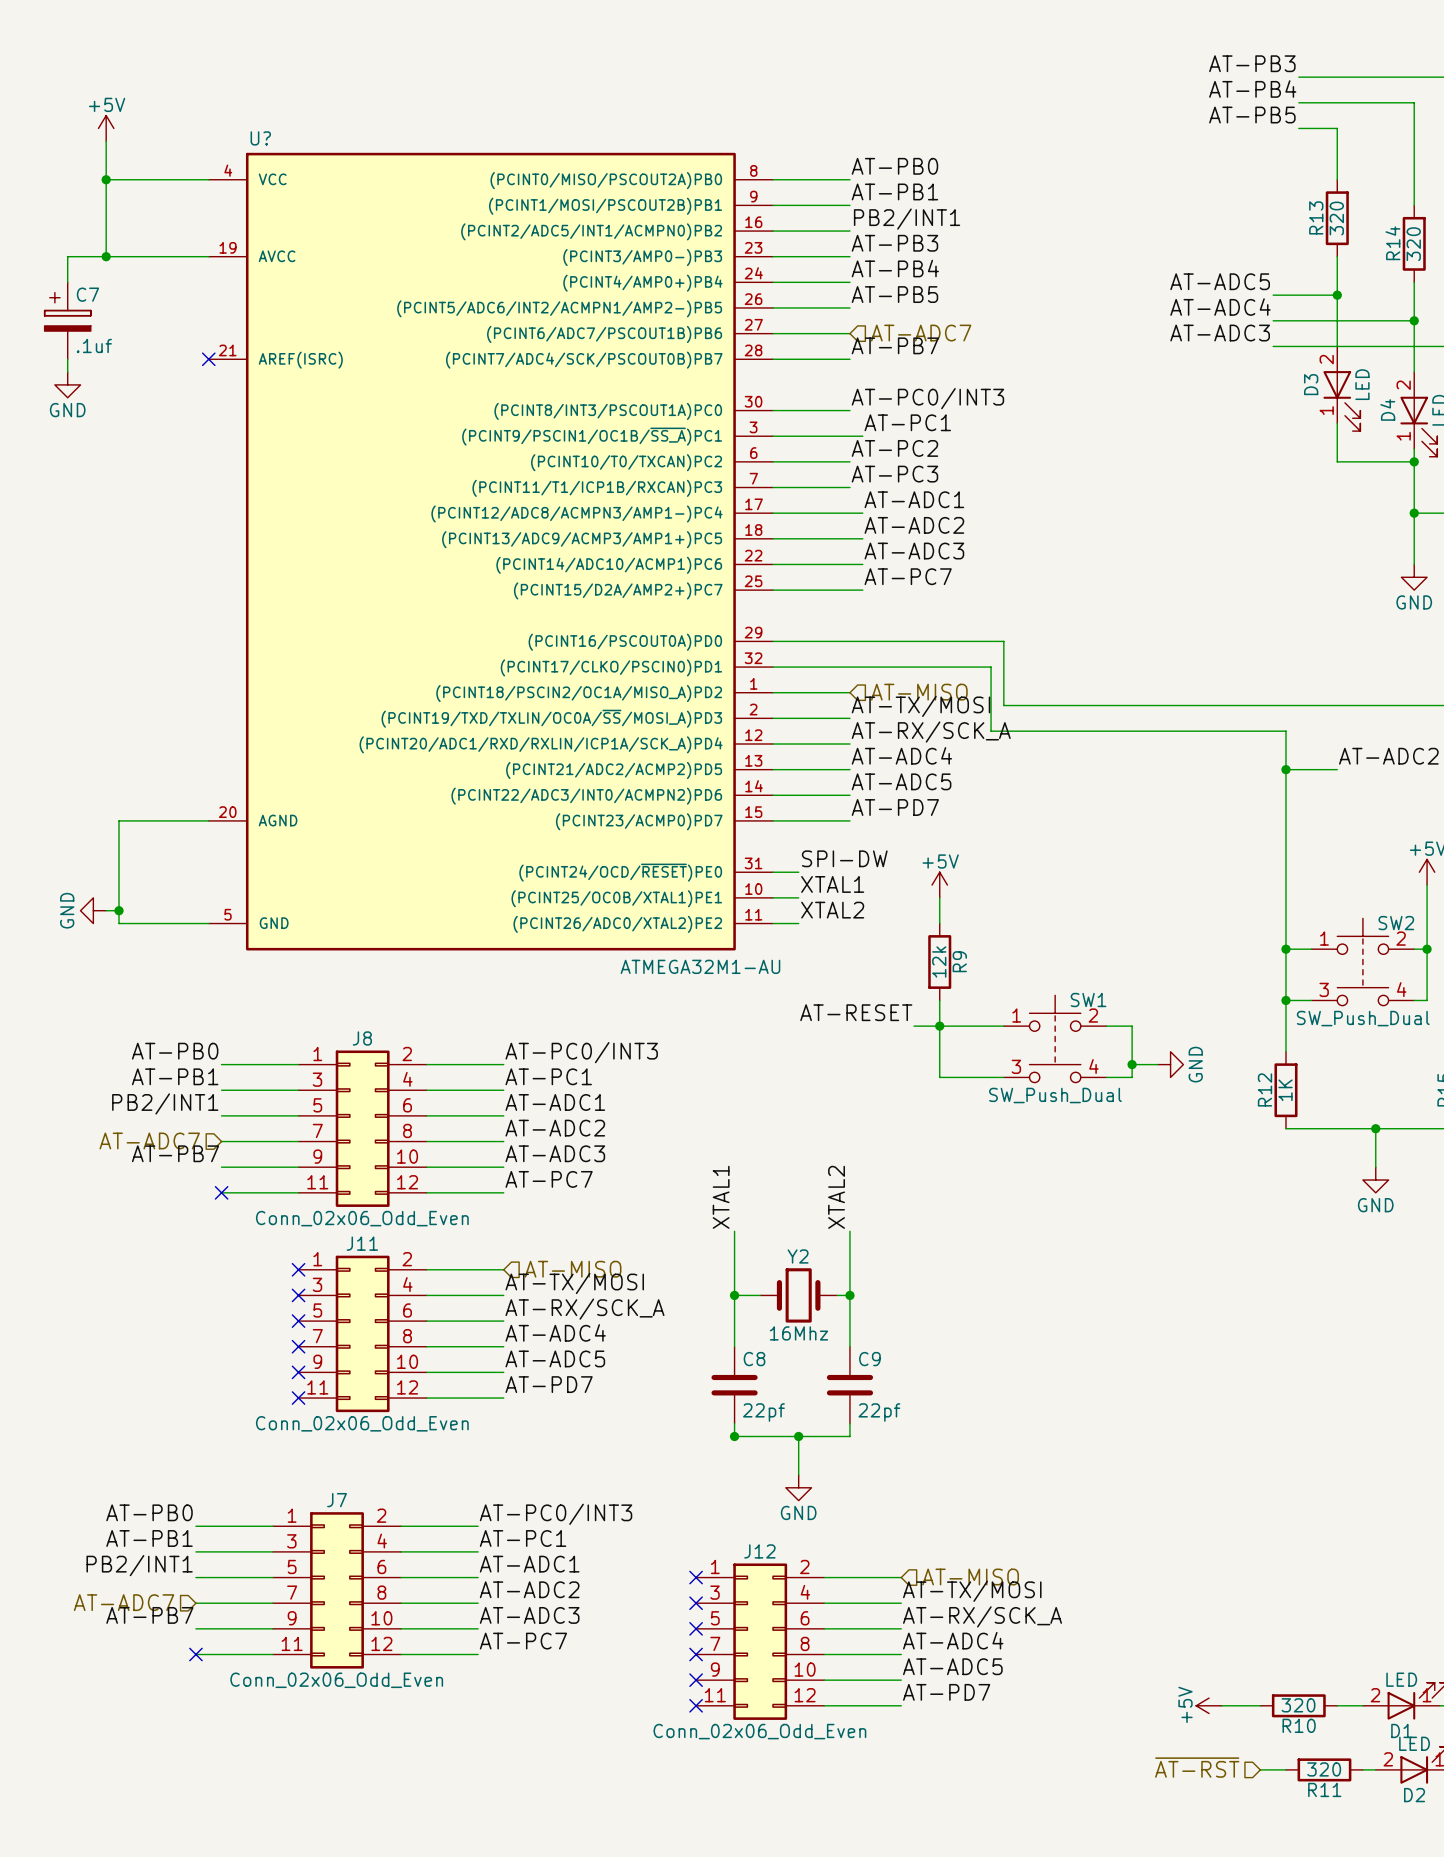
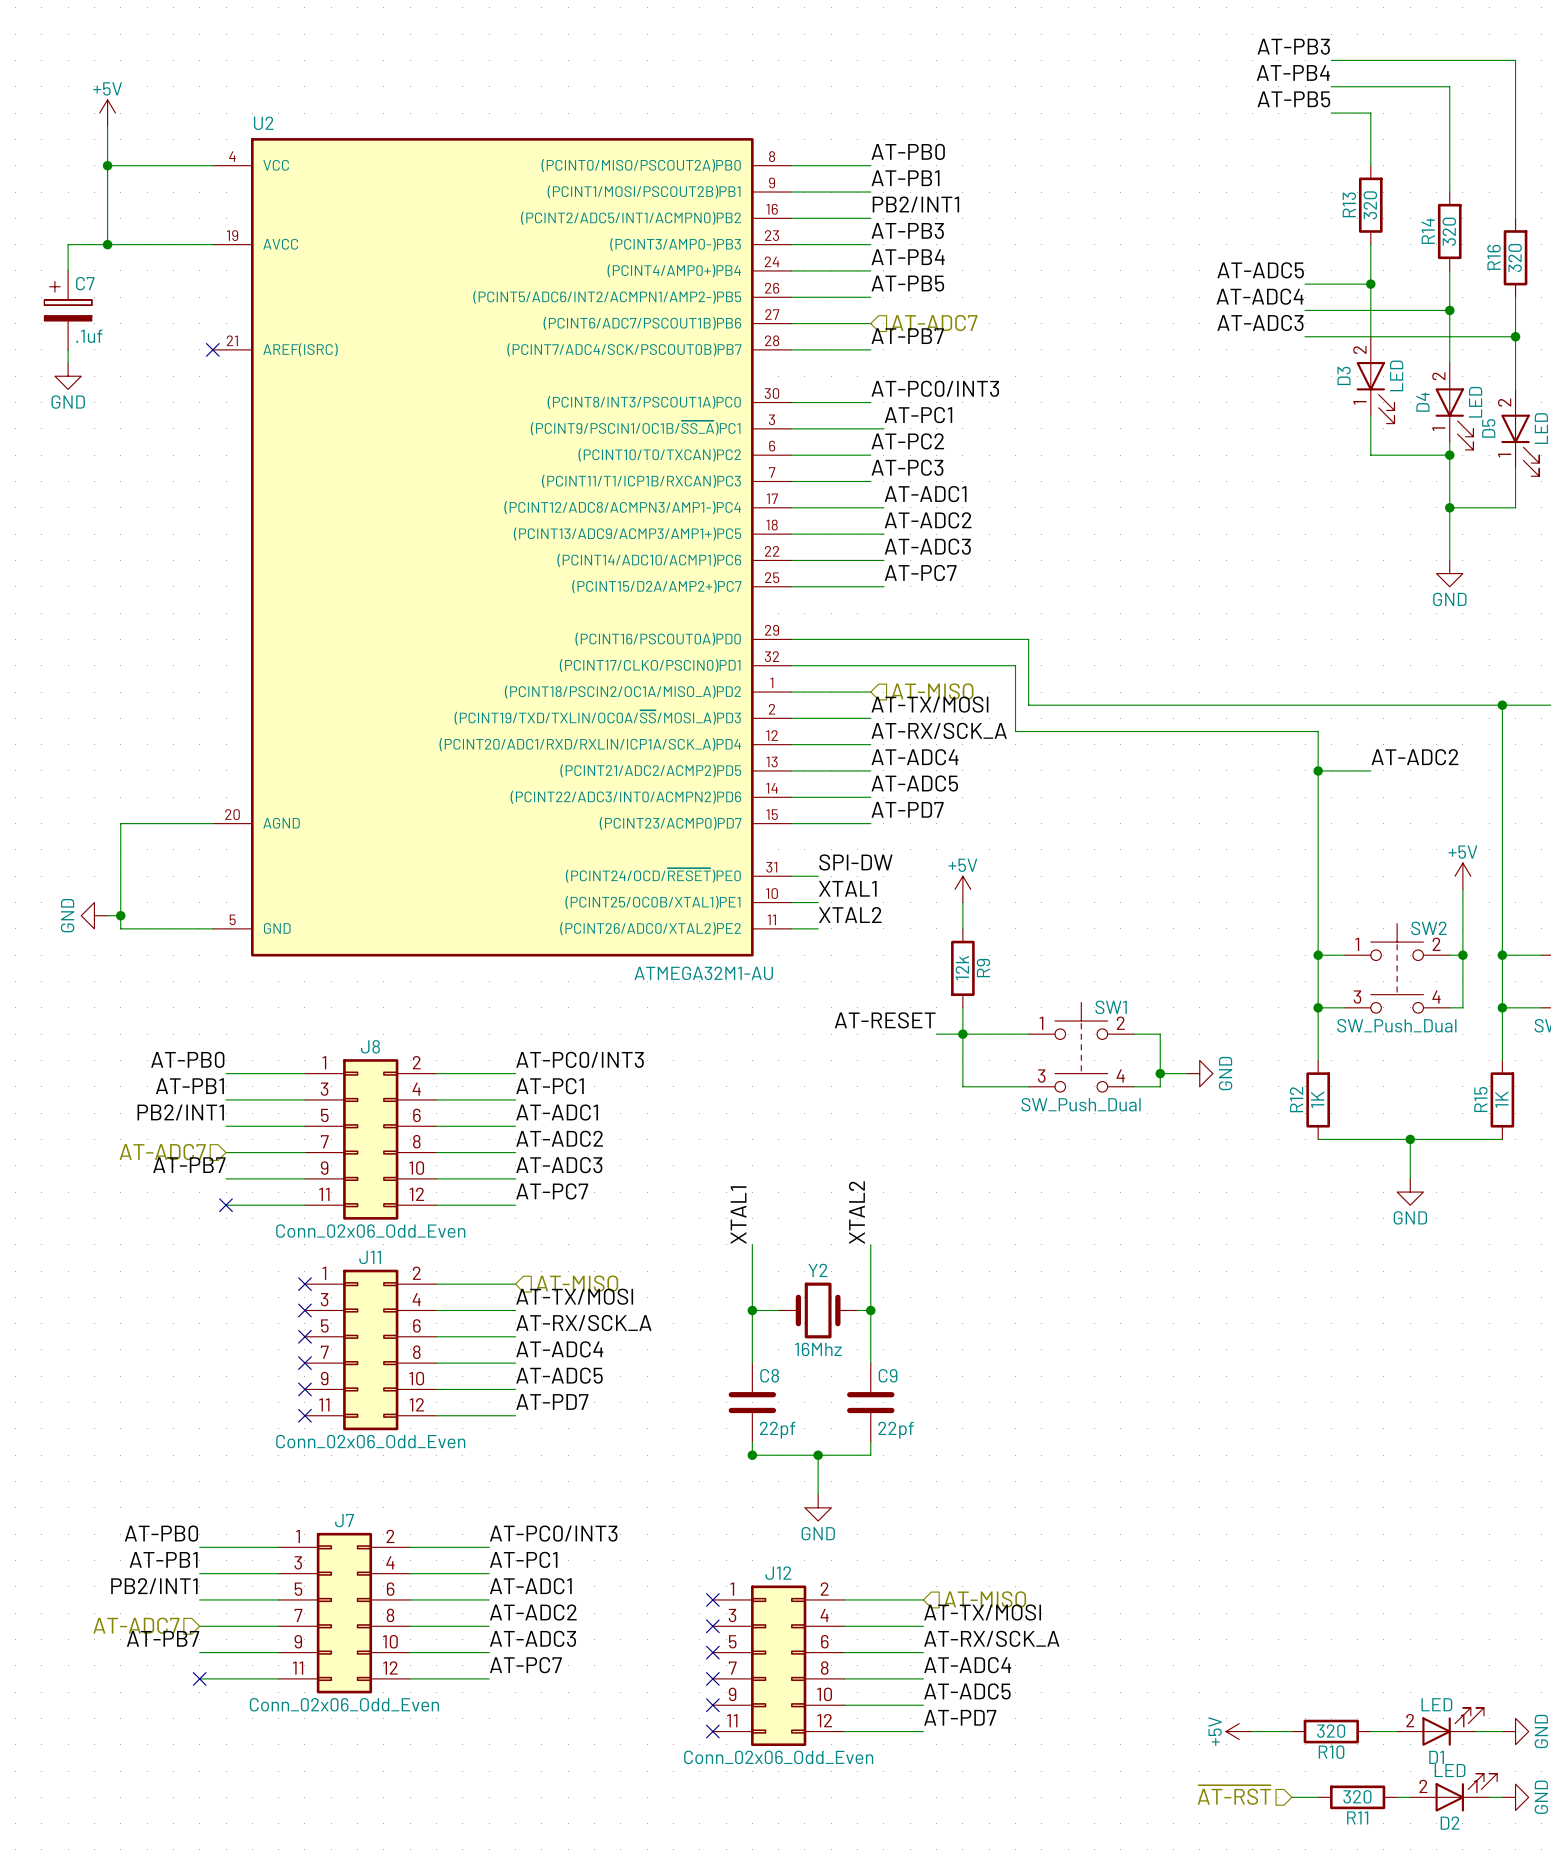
U? name: U? (260, 138) -> U2 (263, 123)

